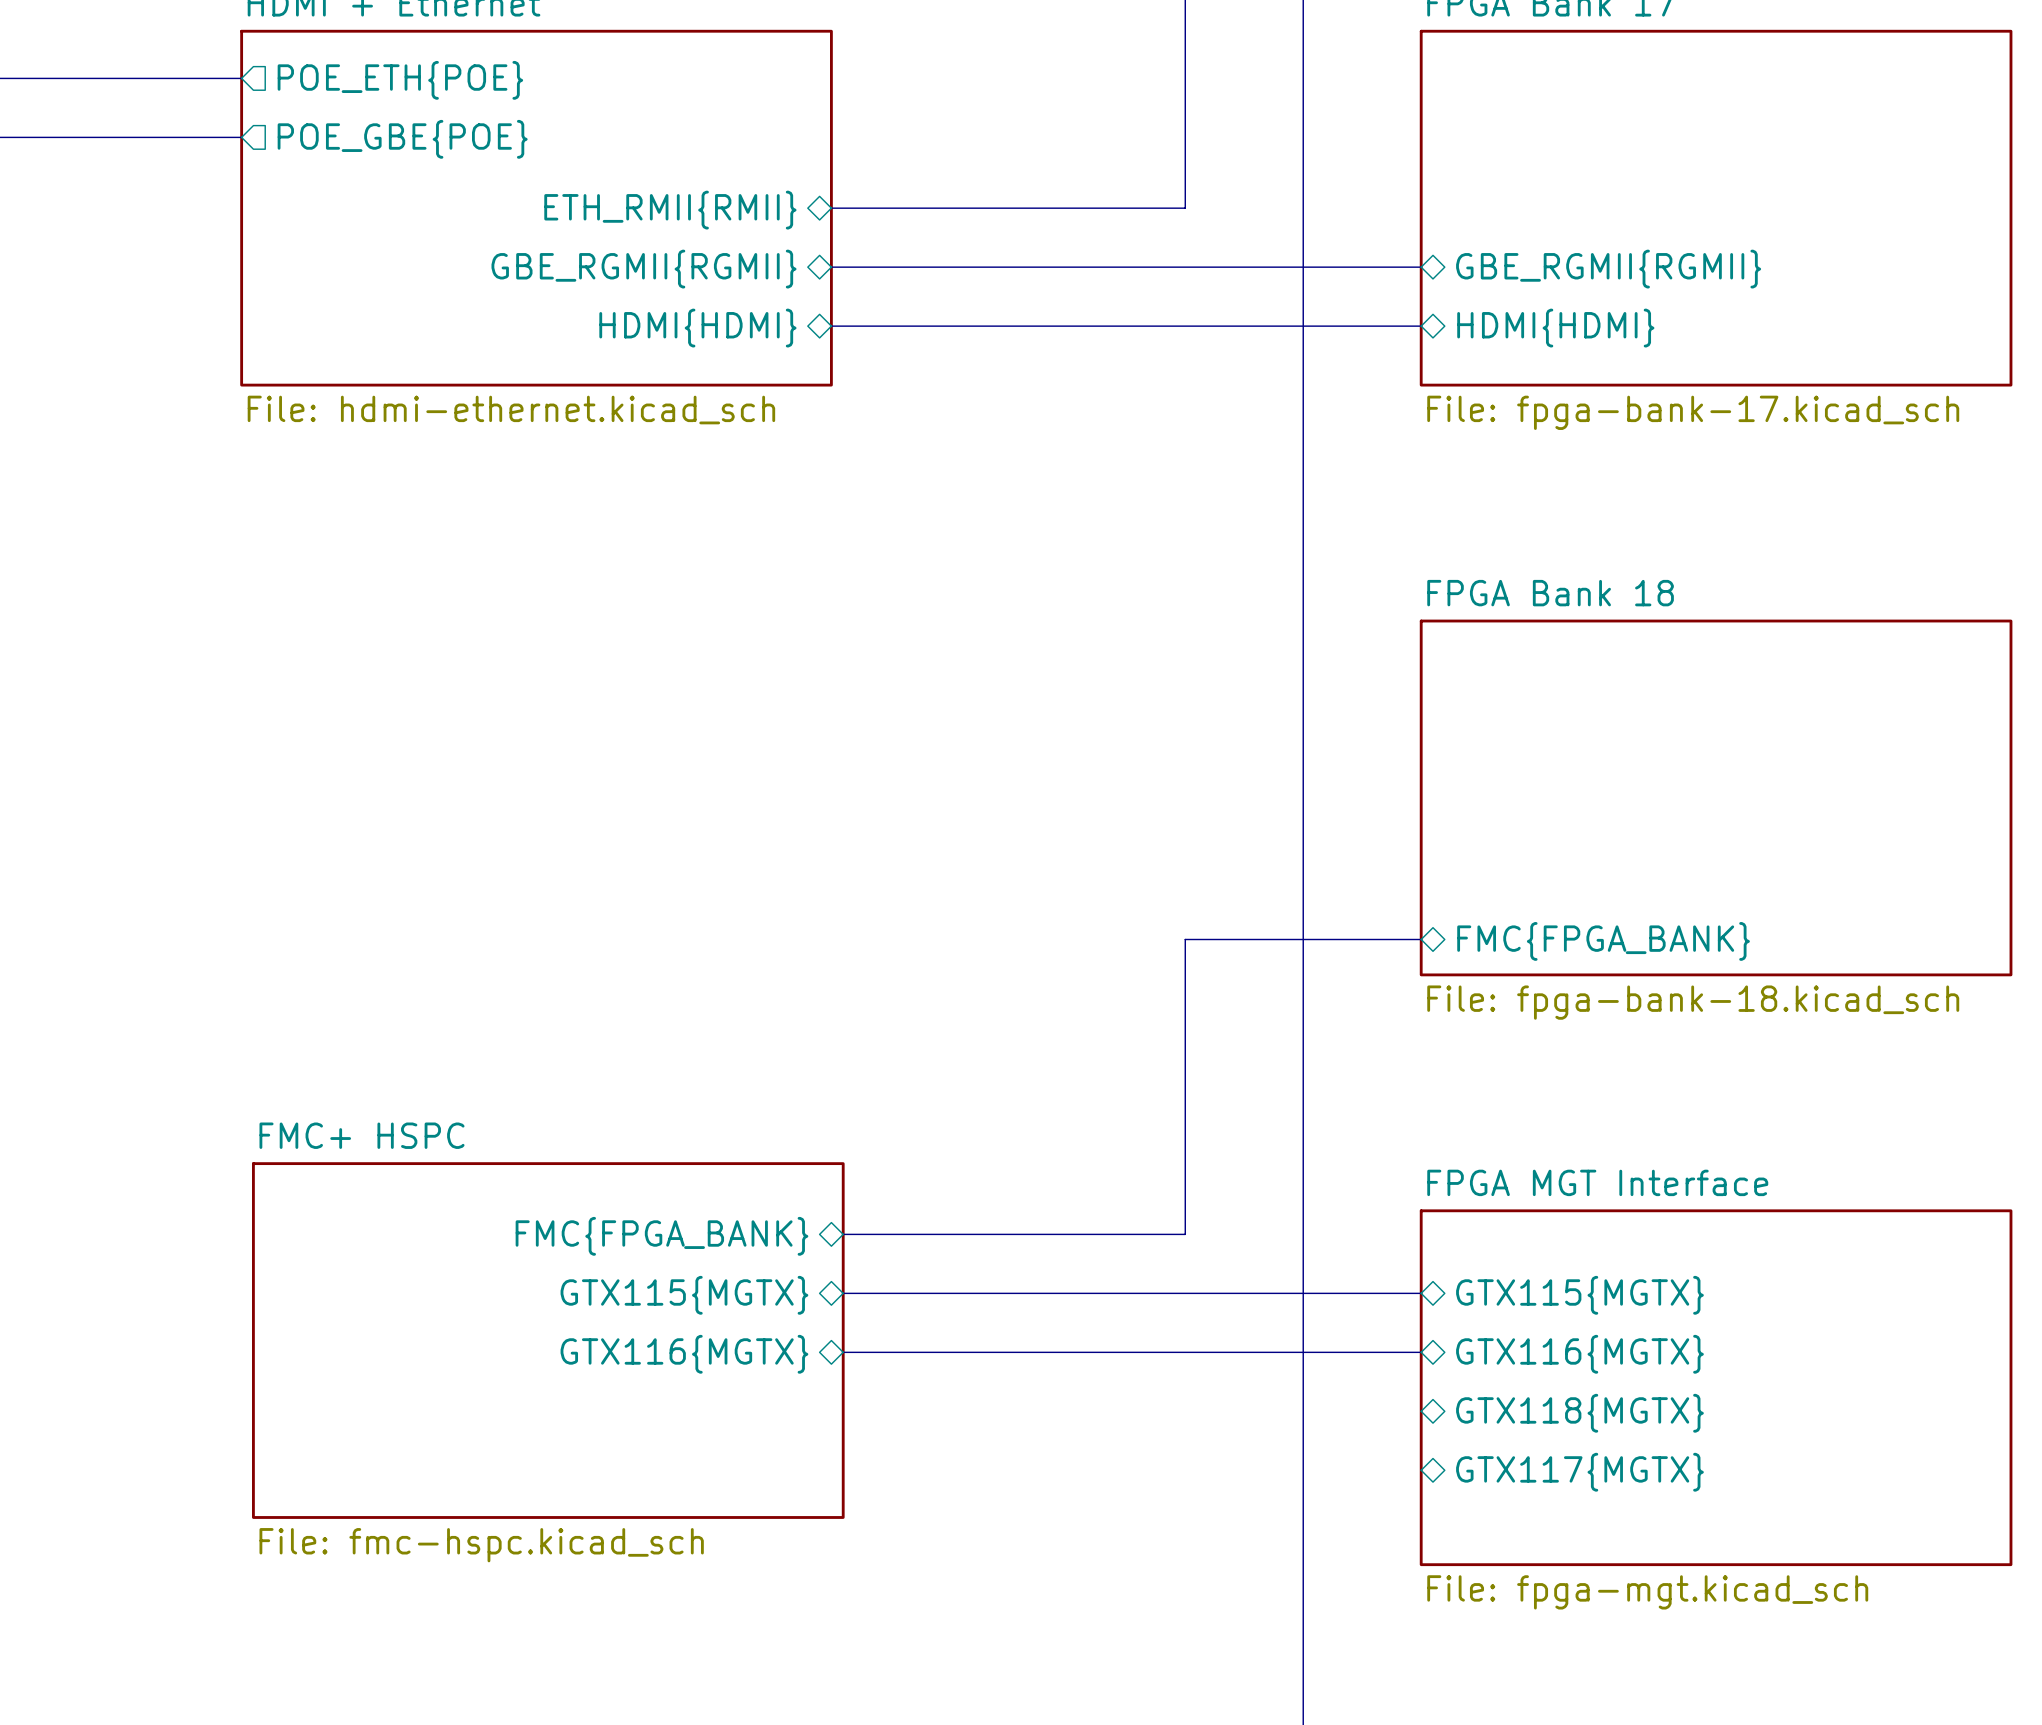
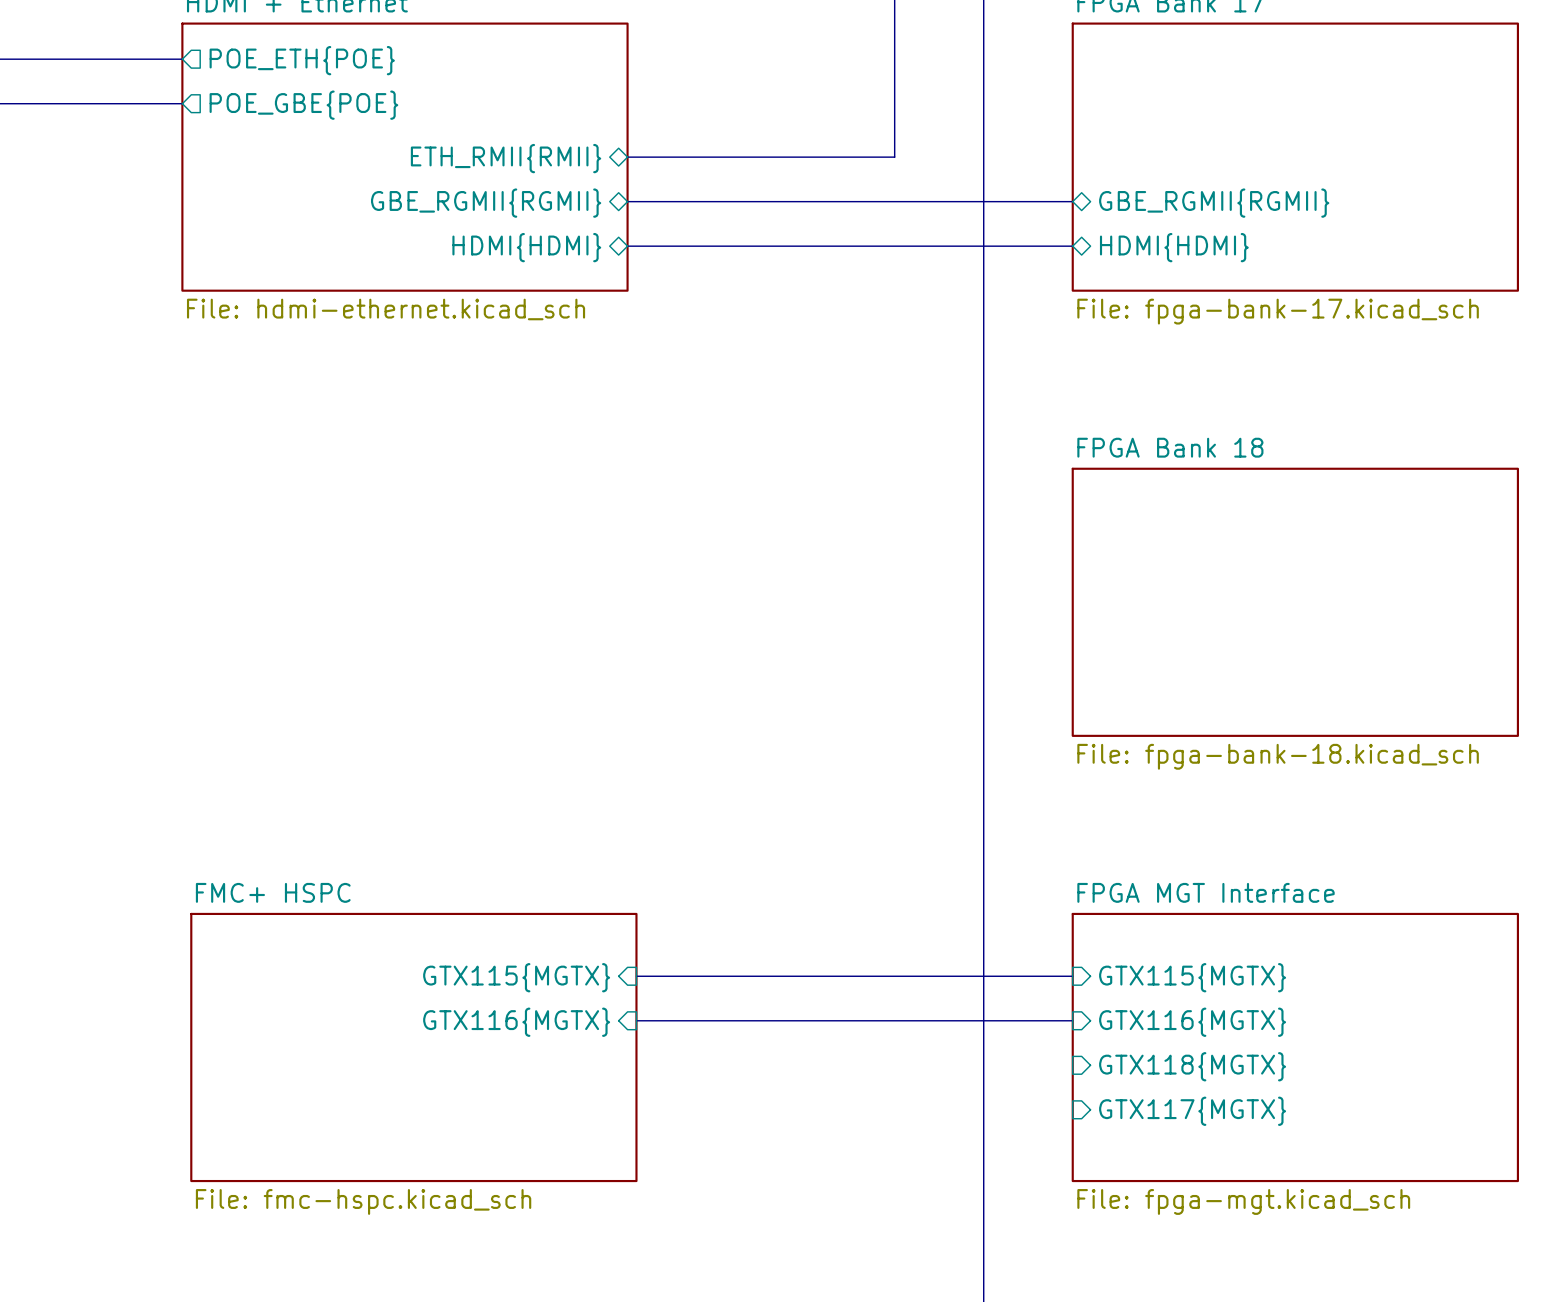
bus: (1421, 939) (1185, 939) (1185, 1234) (843, 1234) -> none
sheet pin: FMC{FPGA_BANK} (1603, 941) -> none
sheet pin: FMC{FPGA_BANK} (661, 1236) -> none
sheet pin shape: bidirectional (684, 1295) -> input (516, 977)
sheet pin shape: bidirectional (1579, 1295) -> input (1192, 977)
sheet FMC+ HSPC position: (548, 1340) -> (413, 1047)
sheet pin shape: bidirectional (684, 1354) -> input (516, 1022)
sheet pin shape: bidirectional (1579, 1354) -> input (1192, 1022)
sheet pin shape: bidirectional (1579, 1413) -> input (1192, 1066)
sheet pin shape: bidirectional (1579, 1472) -> input (1192, 1111)

